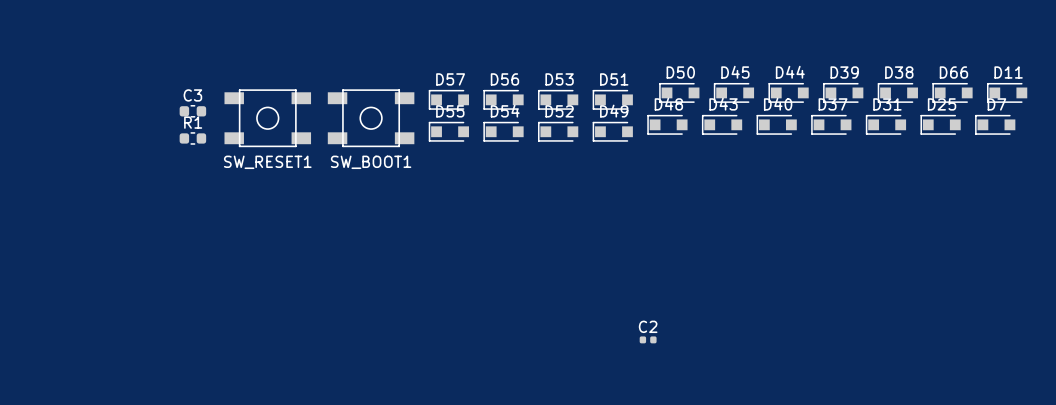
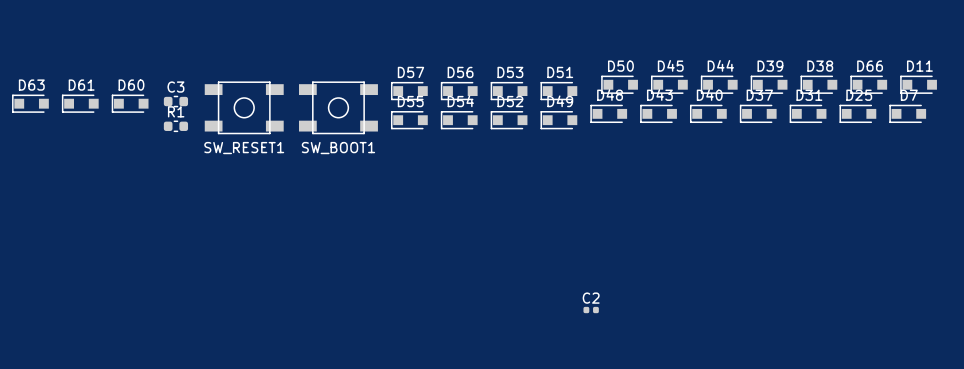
D63: none -> (30, 103)
D61: none -> (80, 103)
D60: none -> (130, 103)

